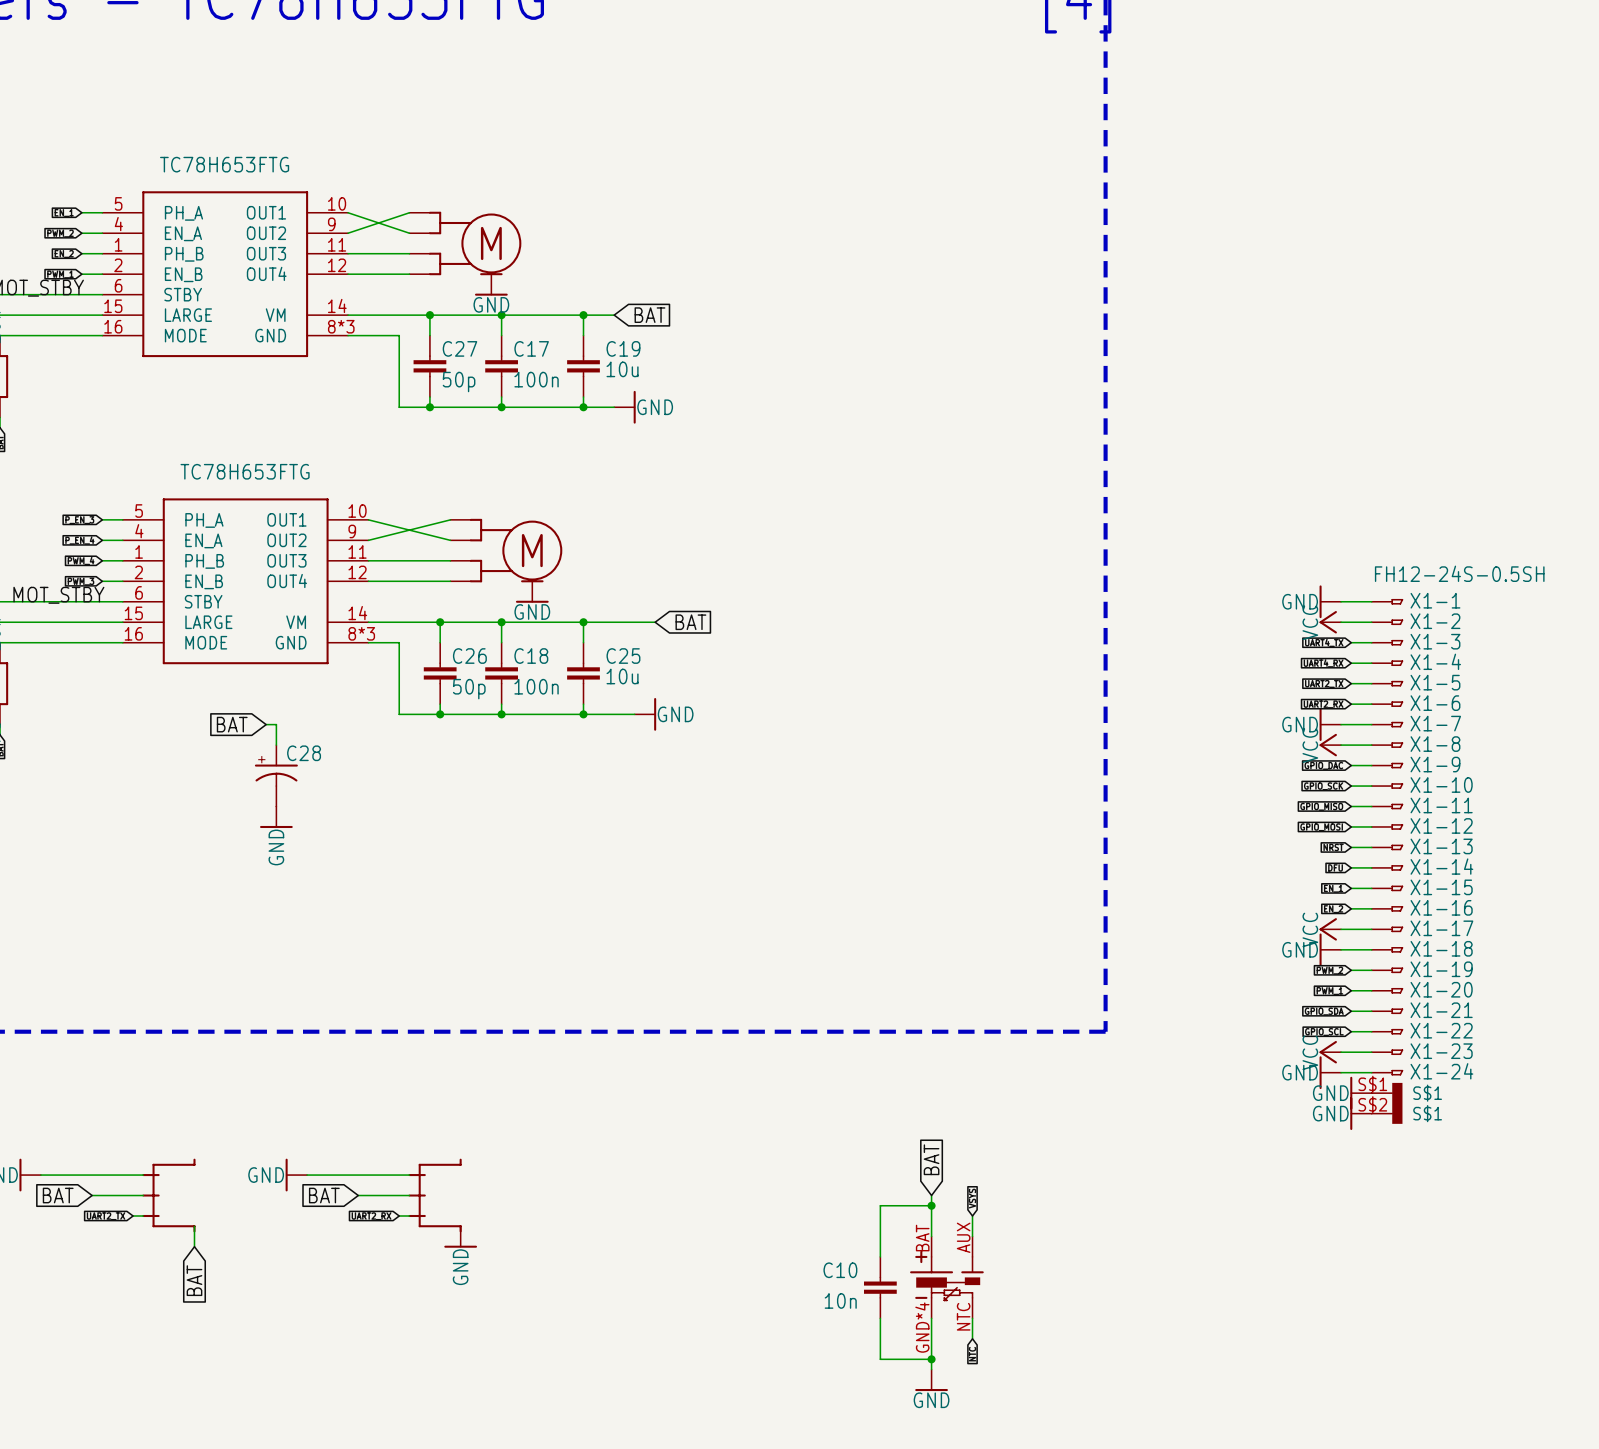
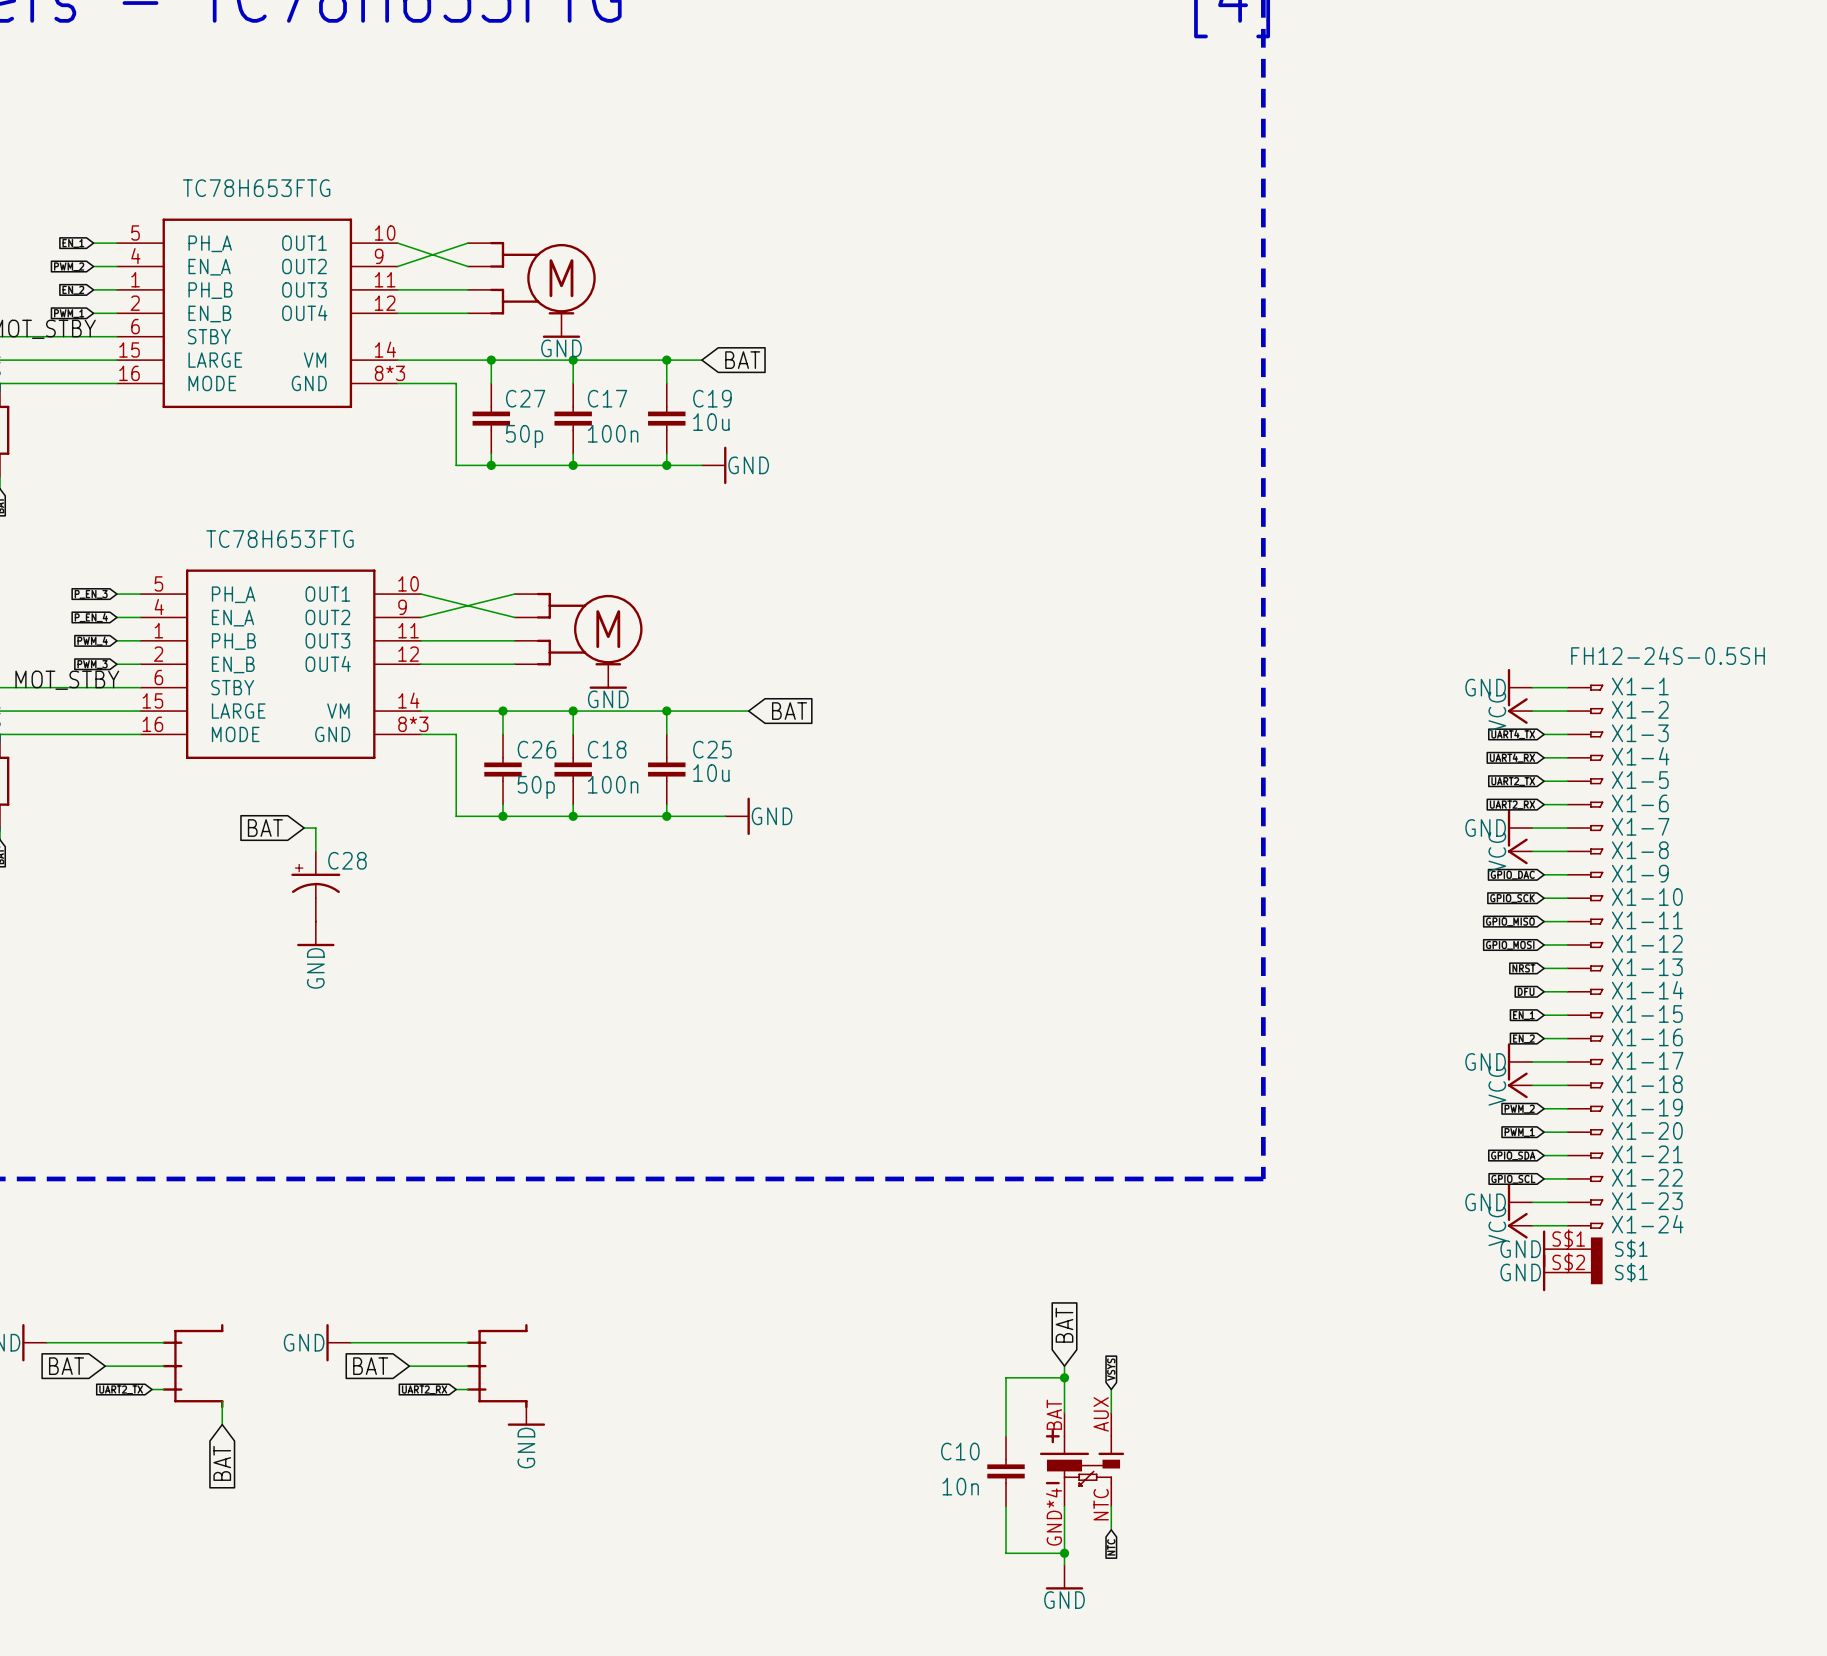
power symbol: VCC (1330, 929) -> GND (1520, 1061)
power symbol: GND (1330, 949) -> VCC (1520, 1085)
power symbol: VCC (1330, 1052) -> GND (1520, 1202)
power symbol: GND (1330, 1072) -> VCC (1520, 1225)

